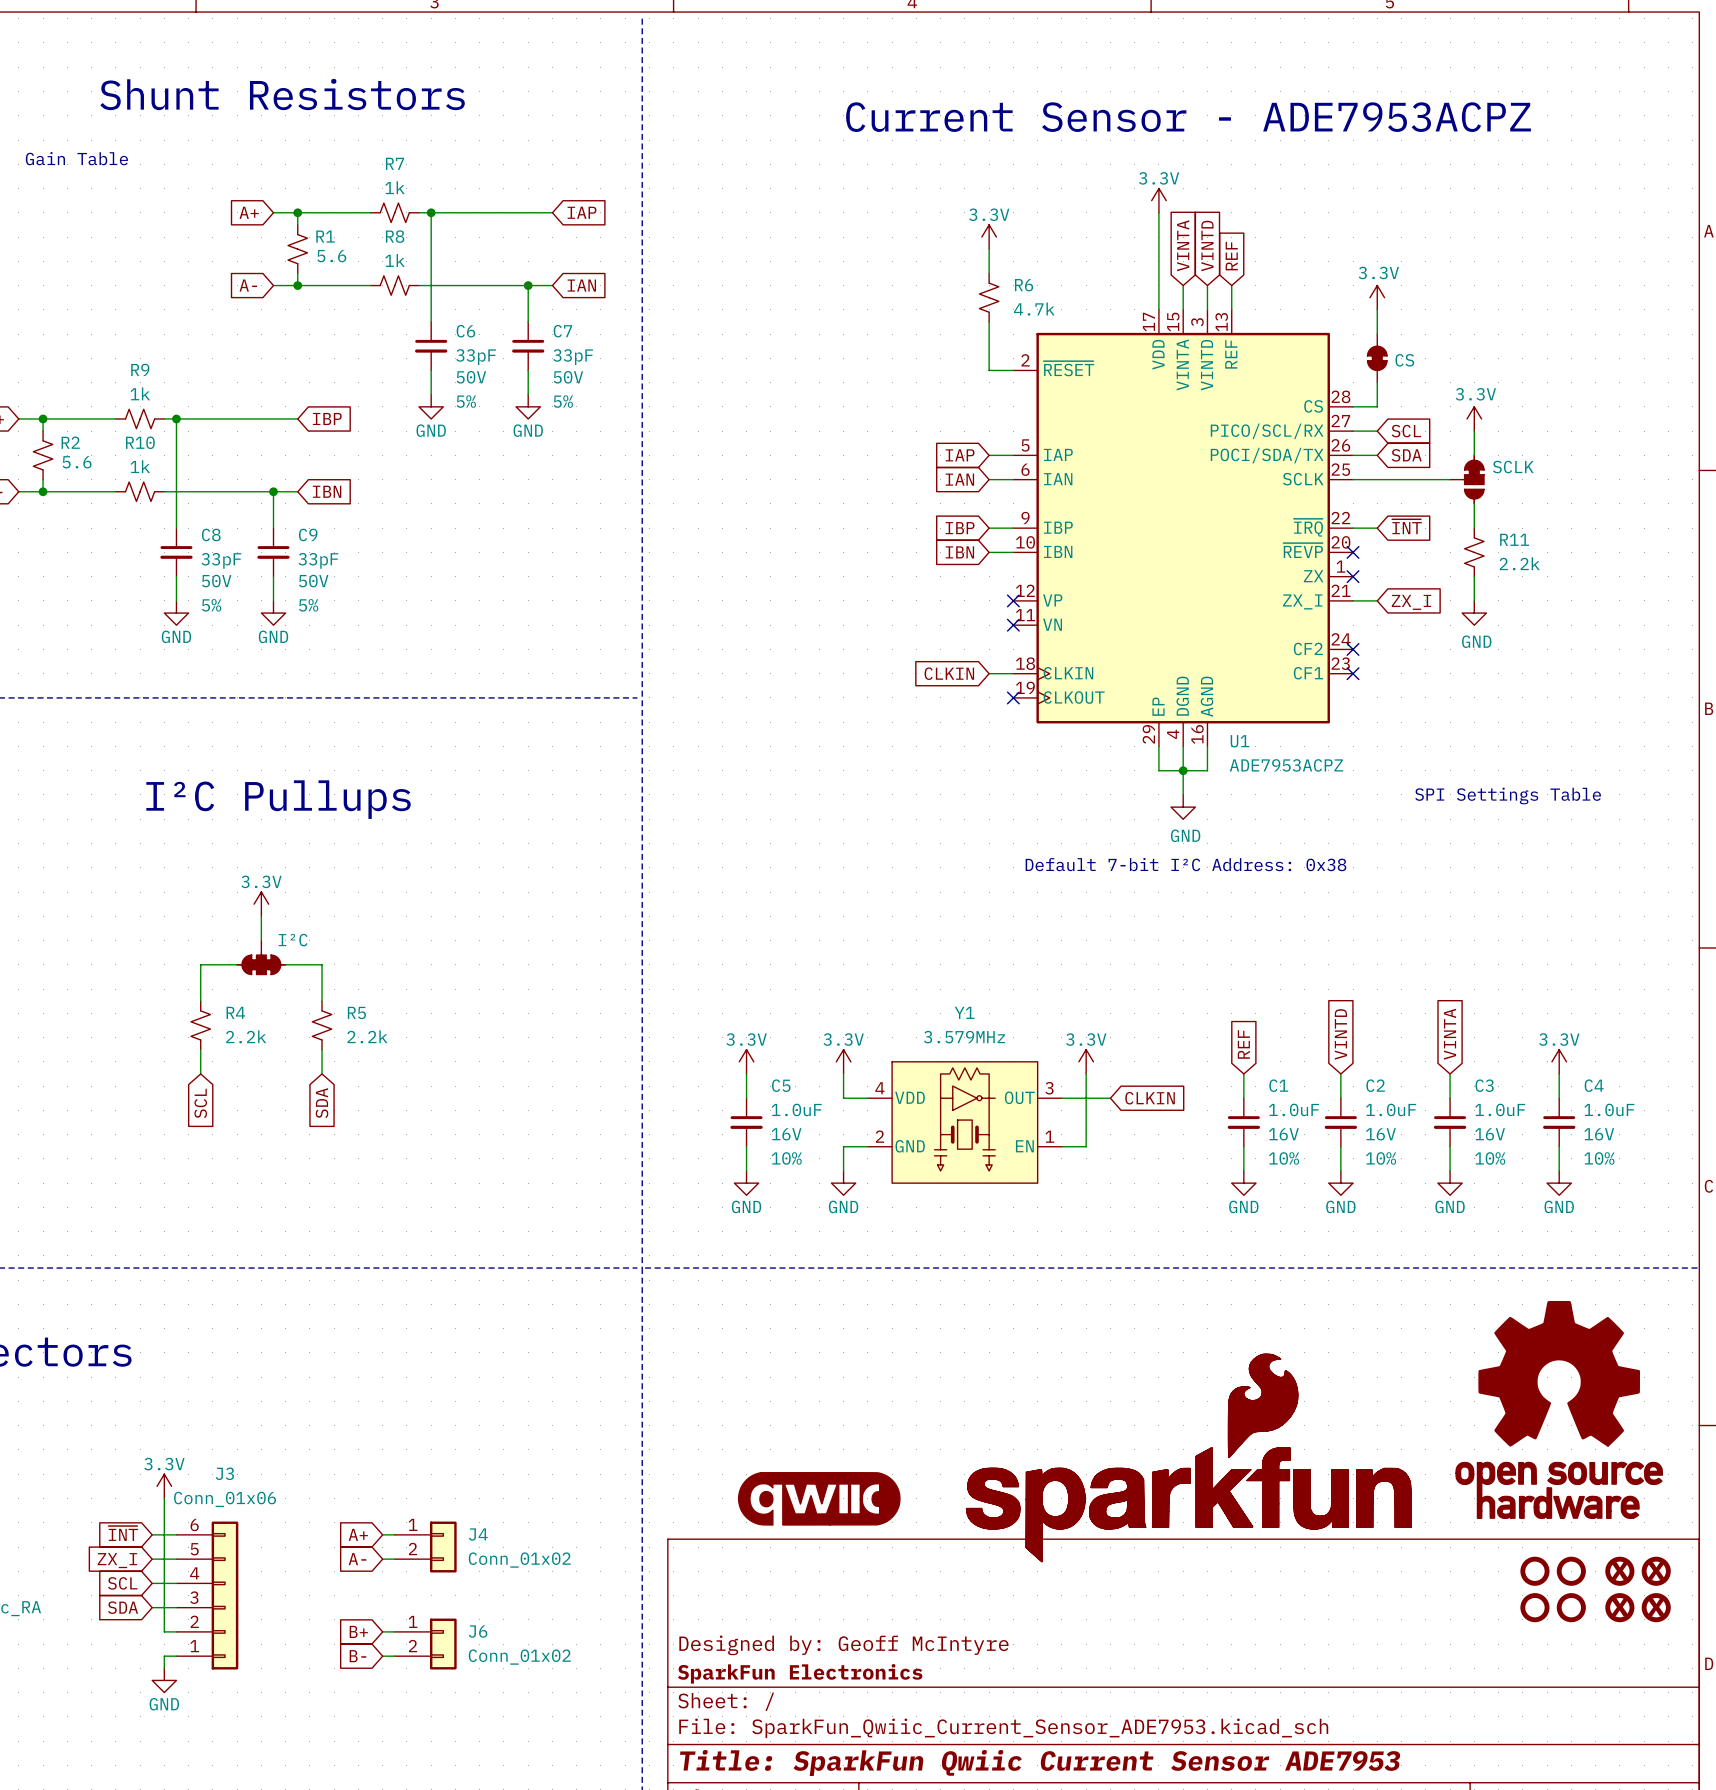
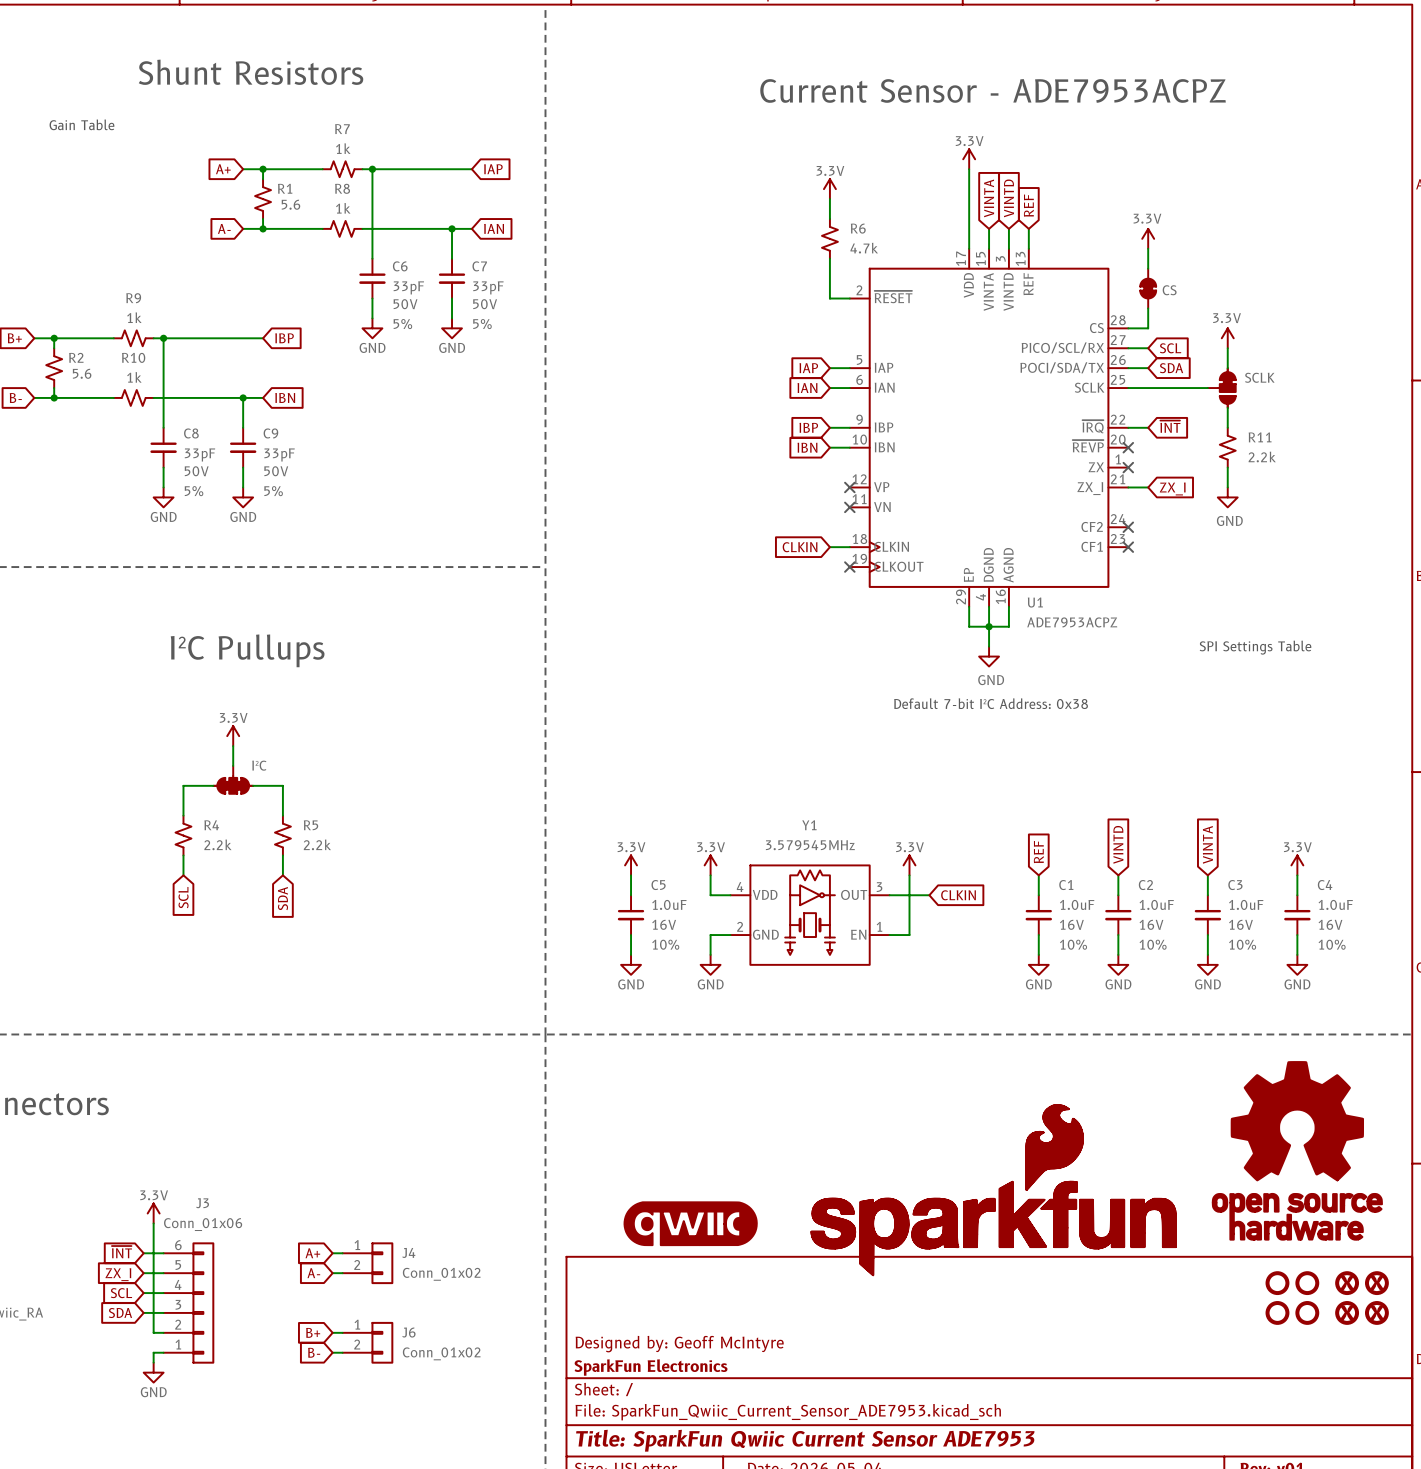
Y1 value: 3.579MHz (964, 1037) -> 3.579545MHz (810, 845)

